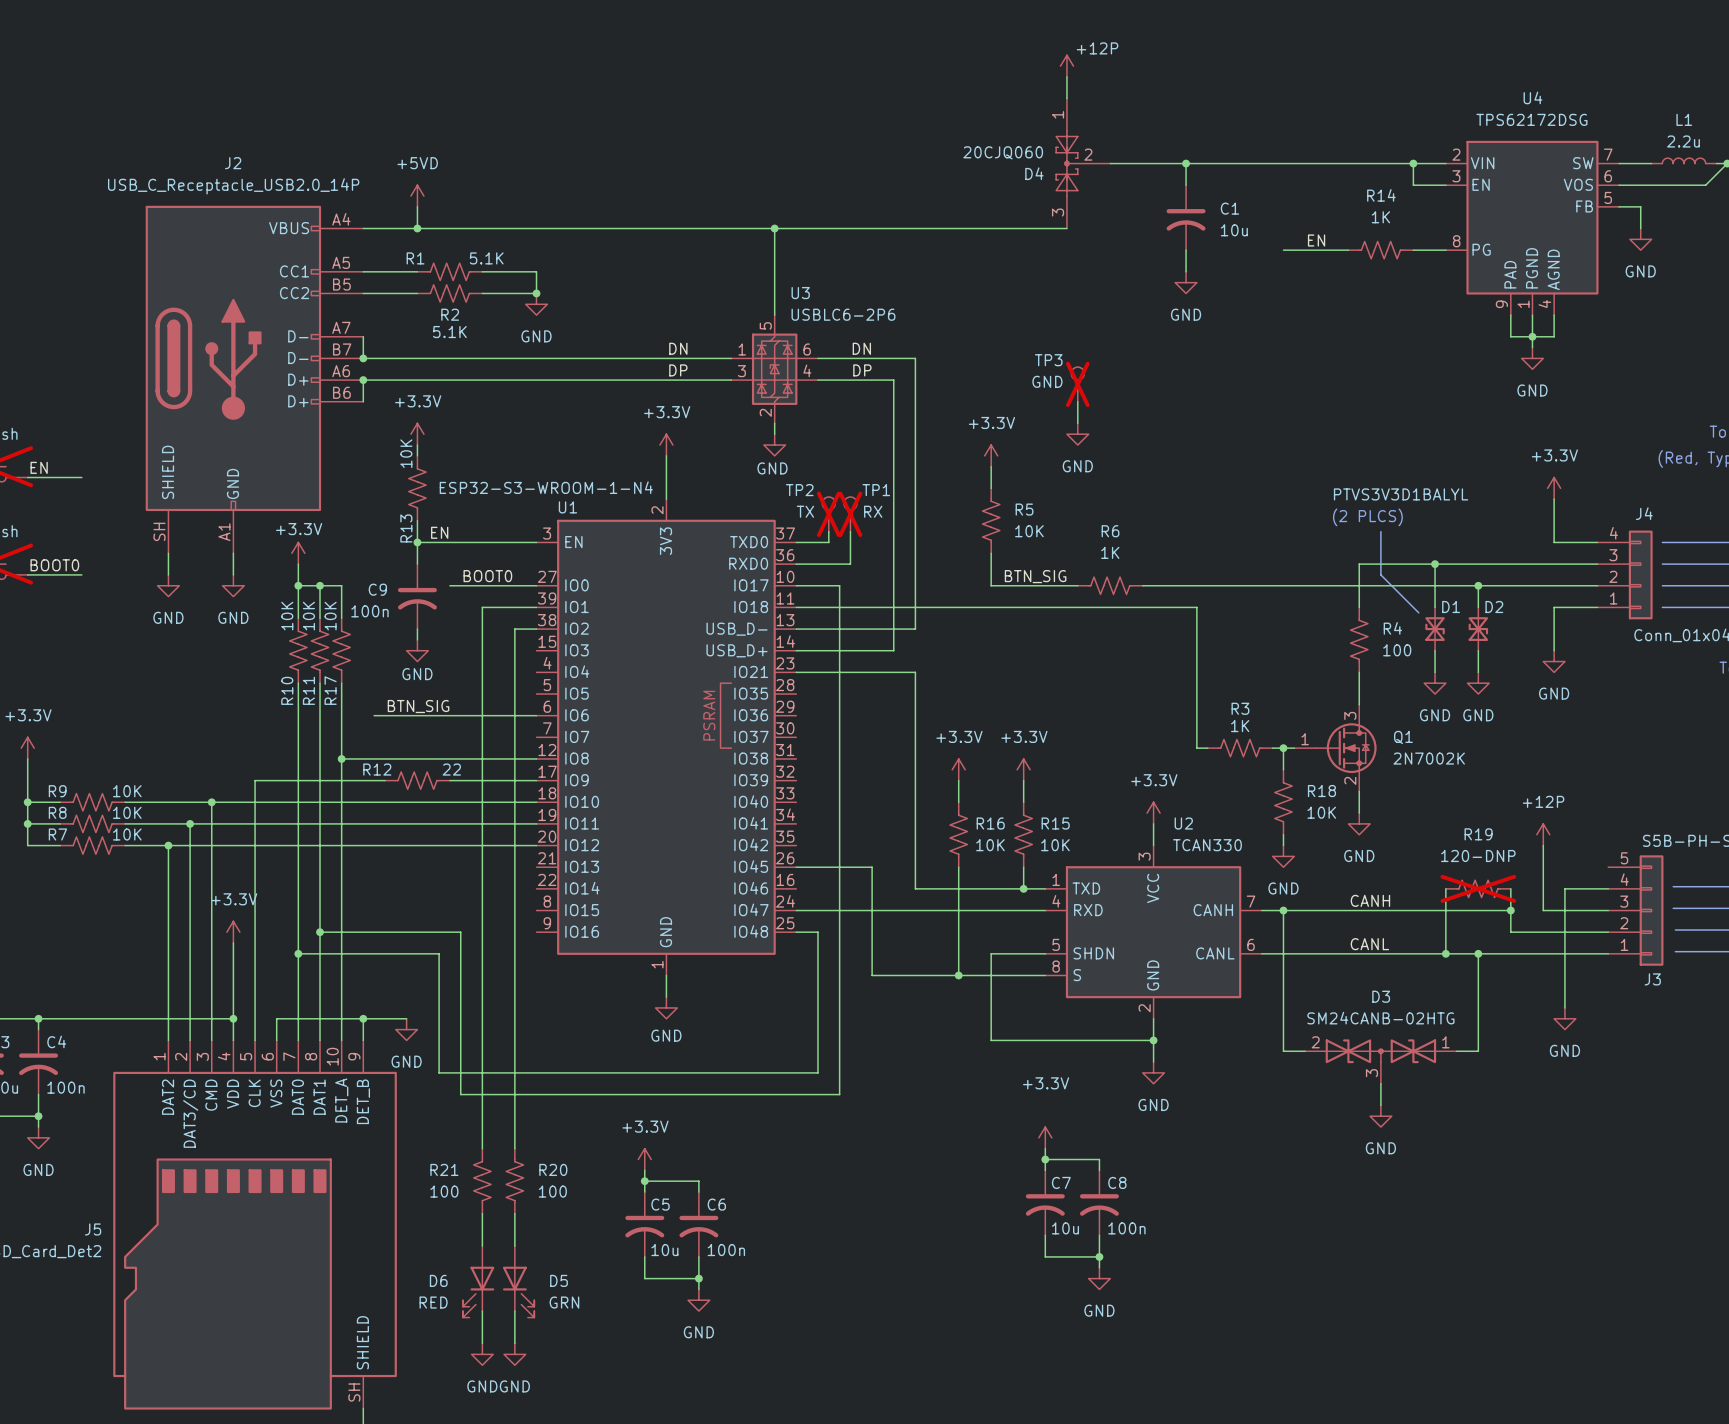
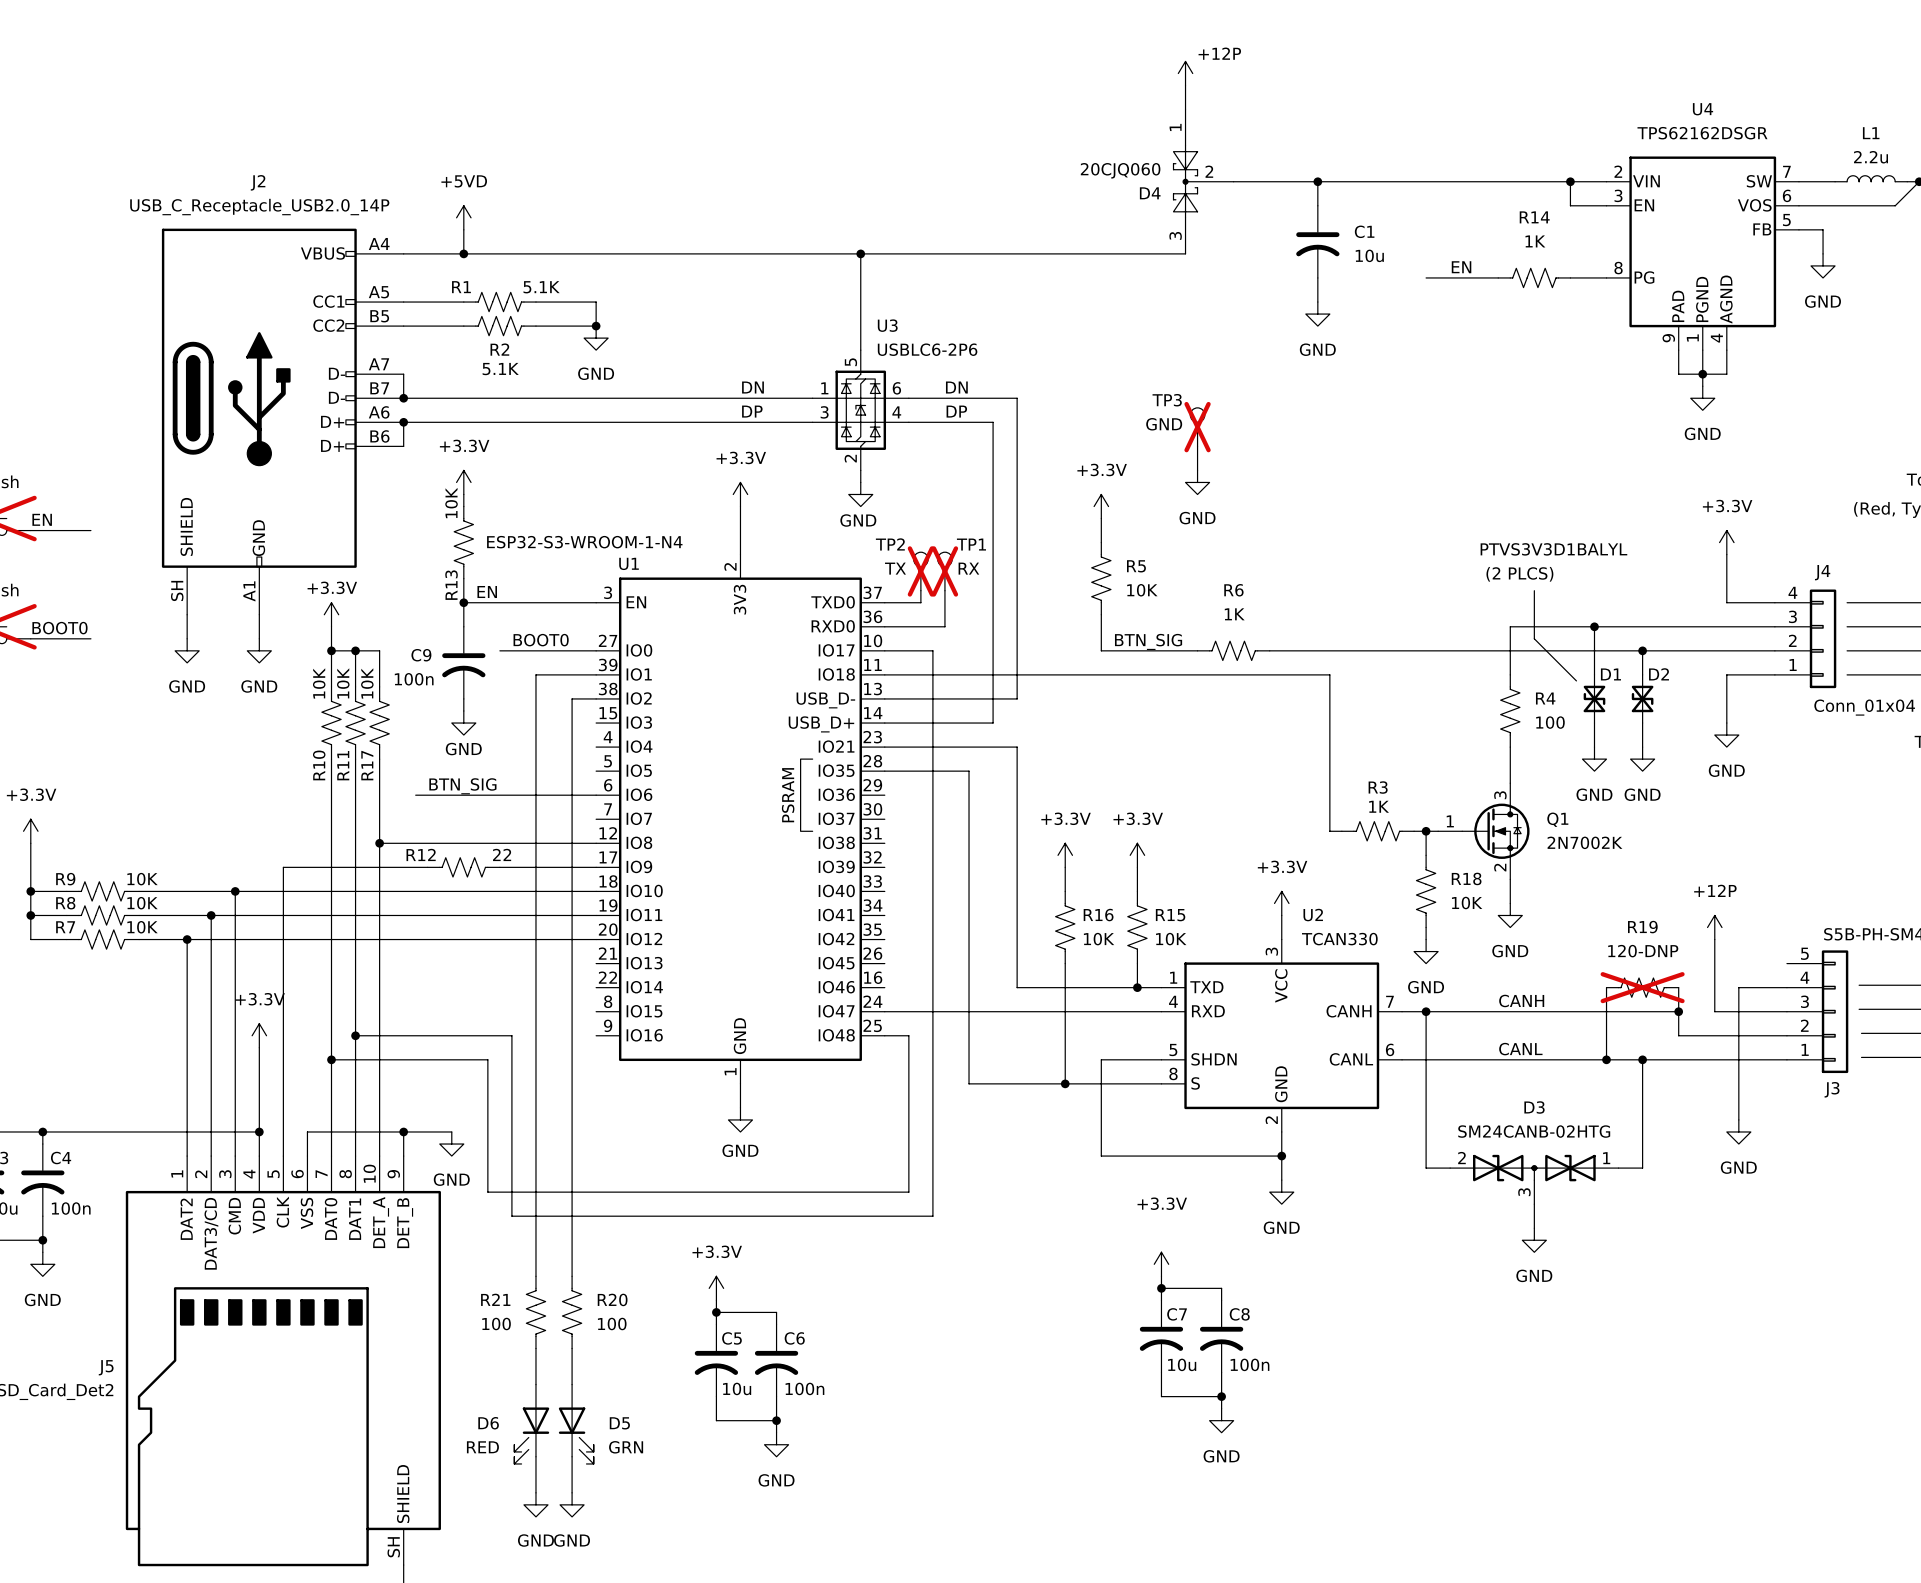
U4 value: TPS62172DSG (1531, 119) -> TPS62162DSGR (1702, 133)
wire: (796, 867) (872, 867) -> (884, 771) (969, 771) (969, 963)

